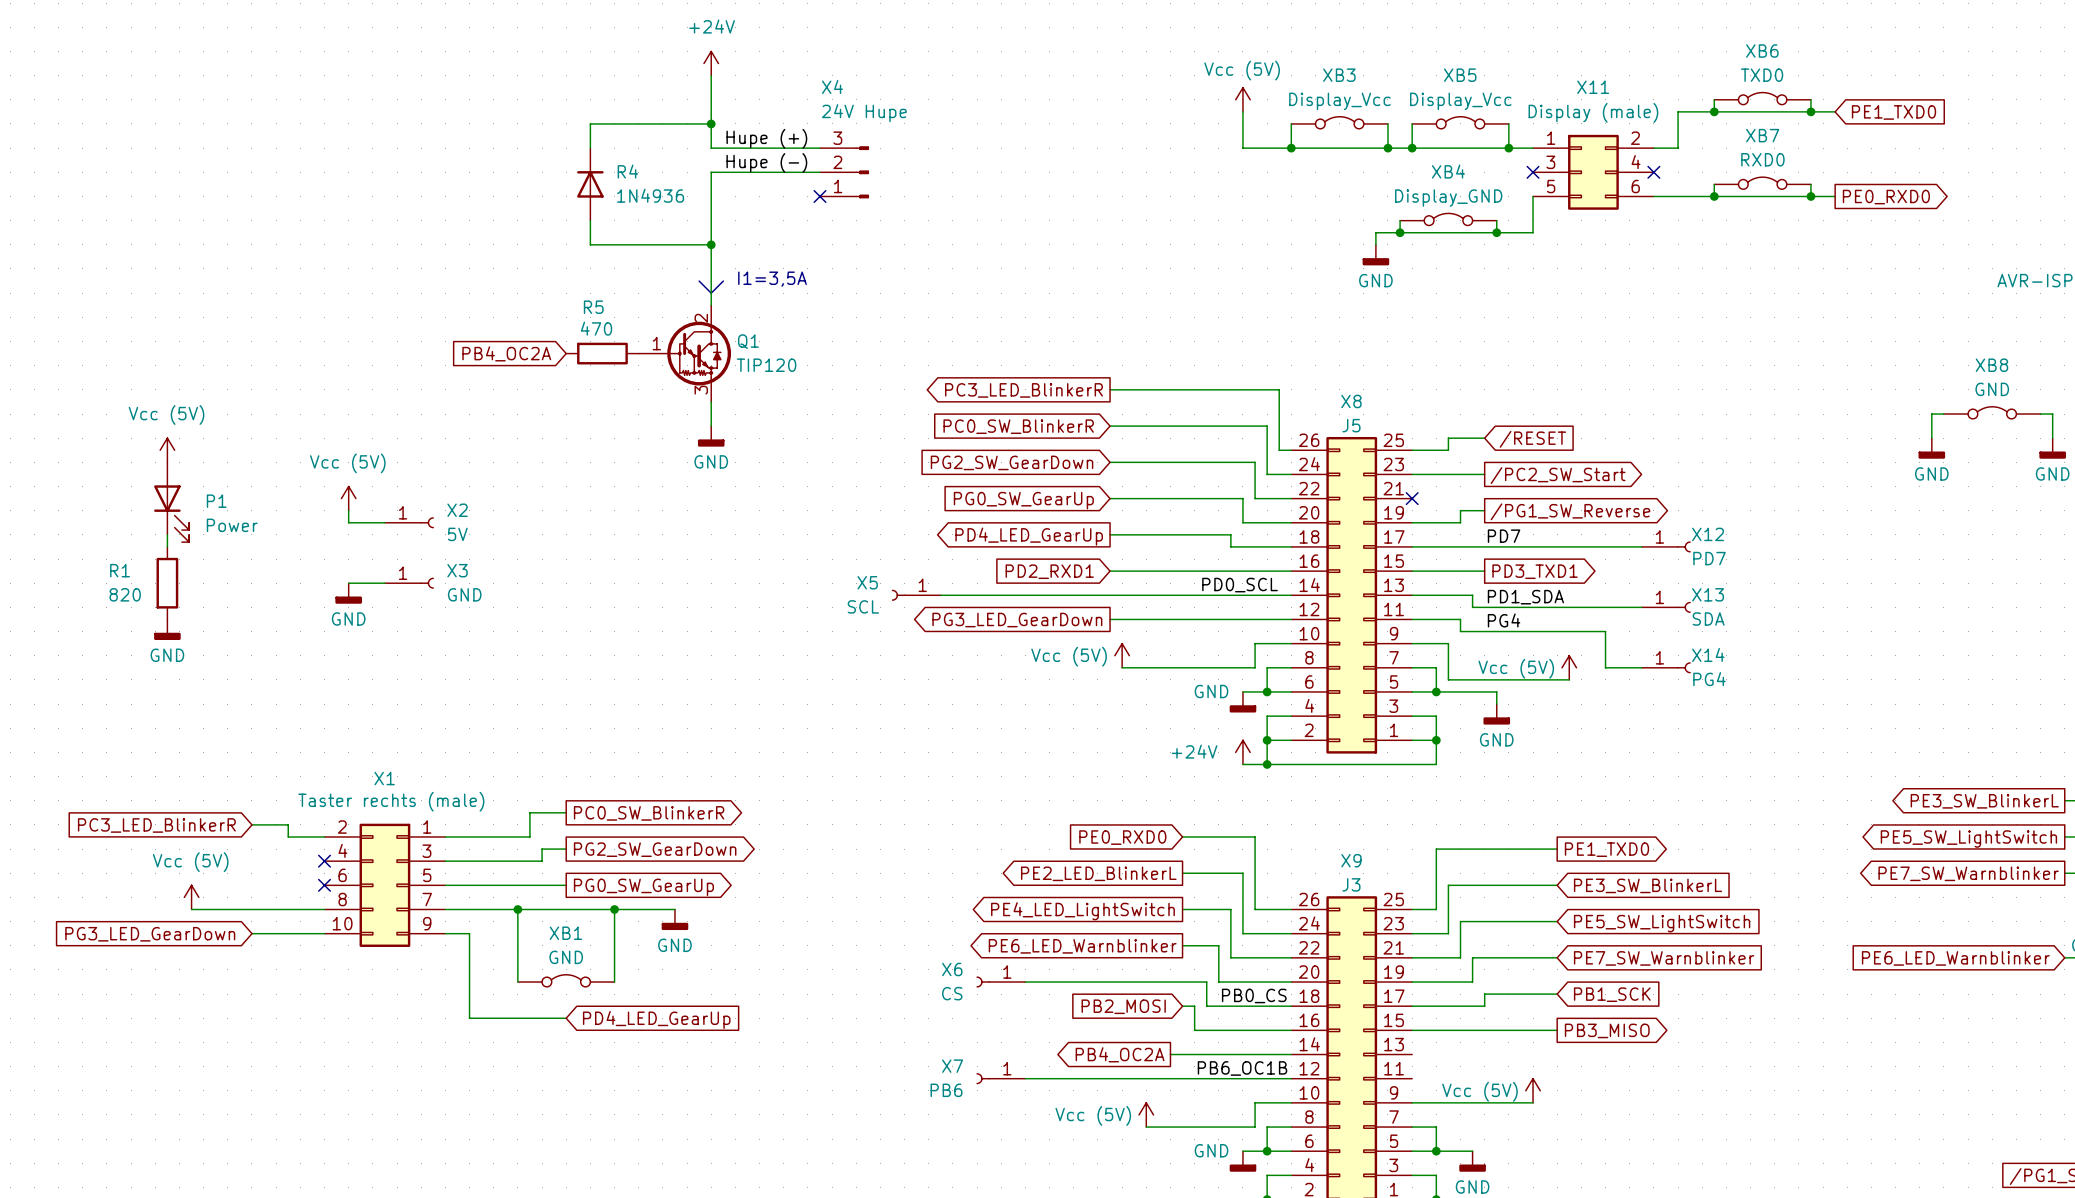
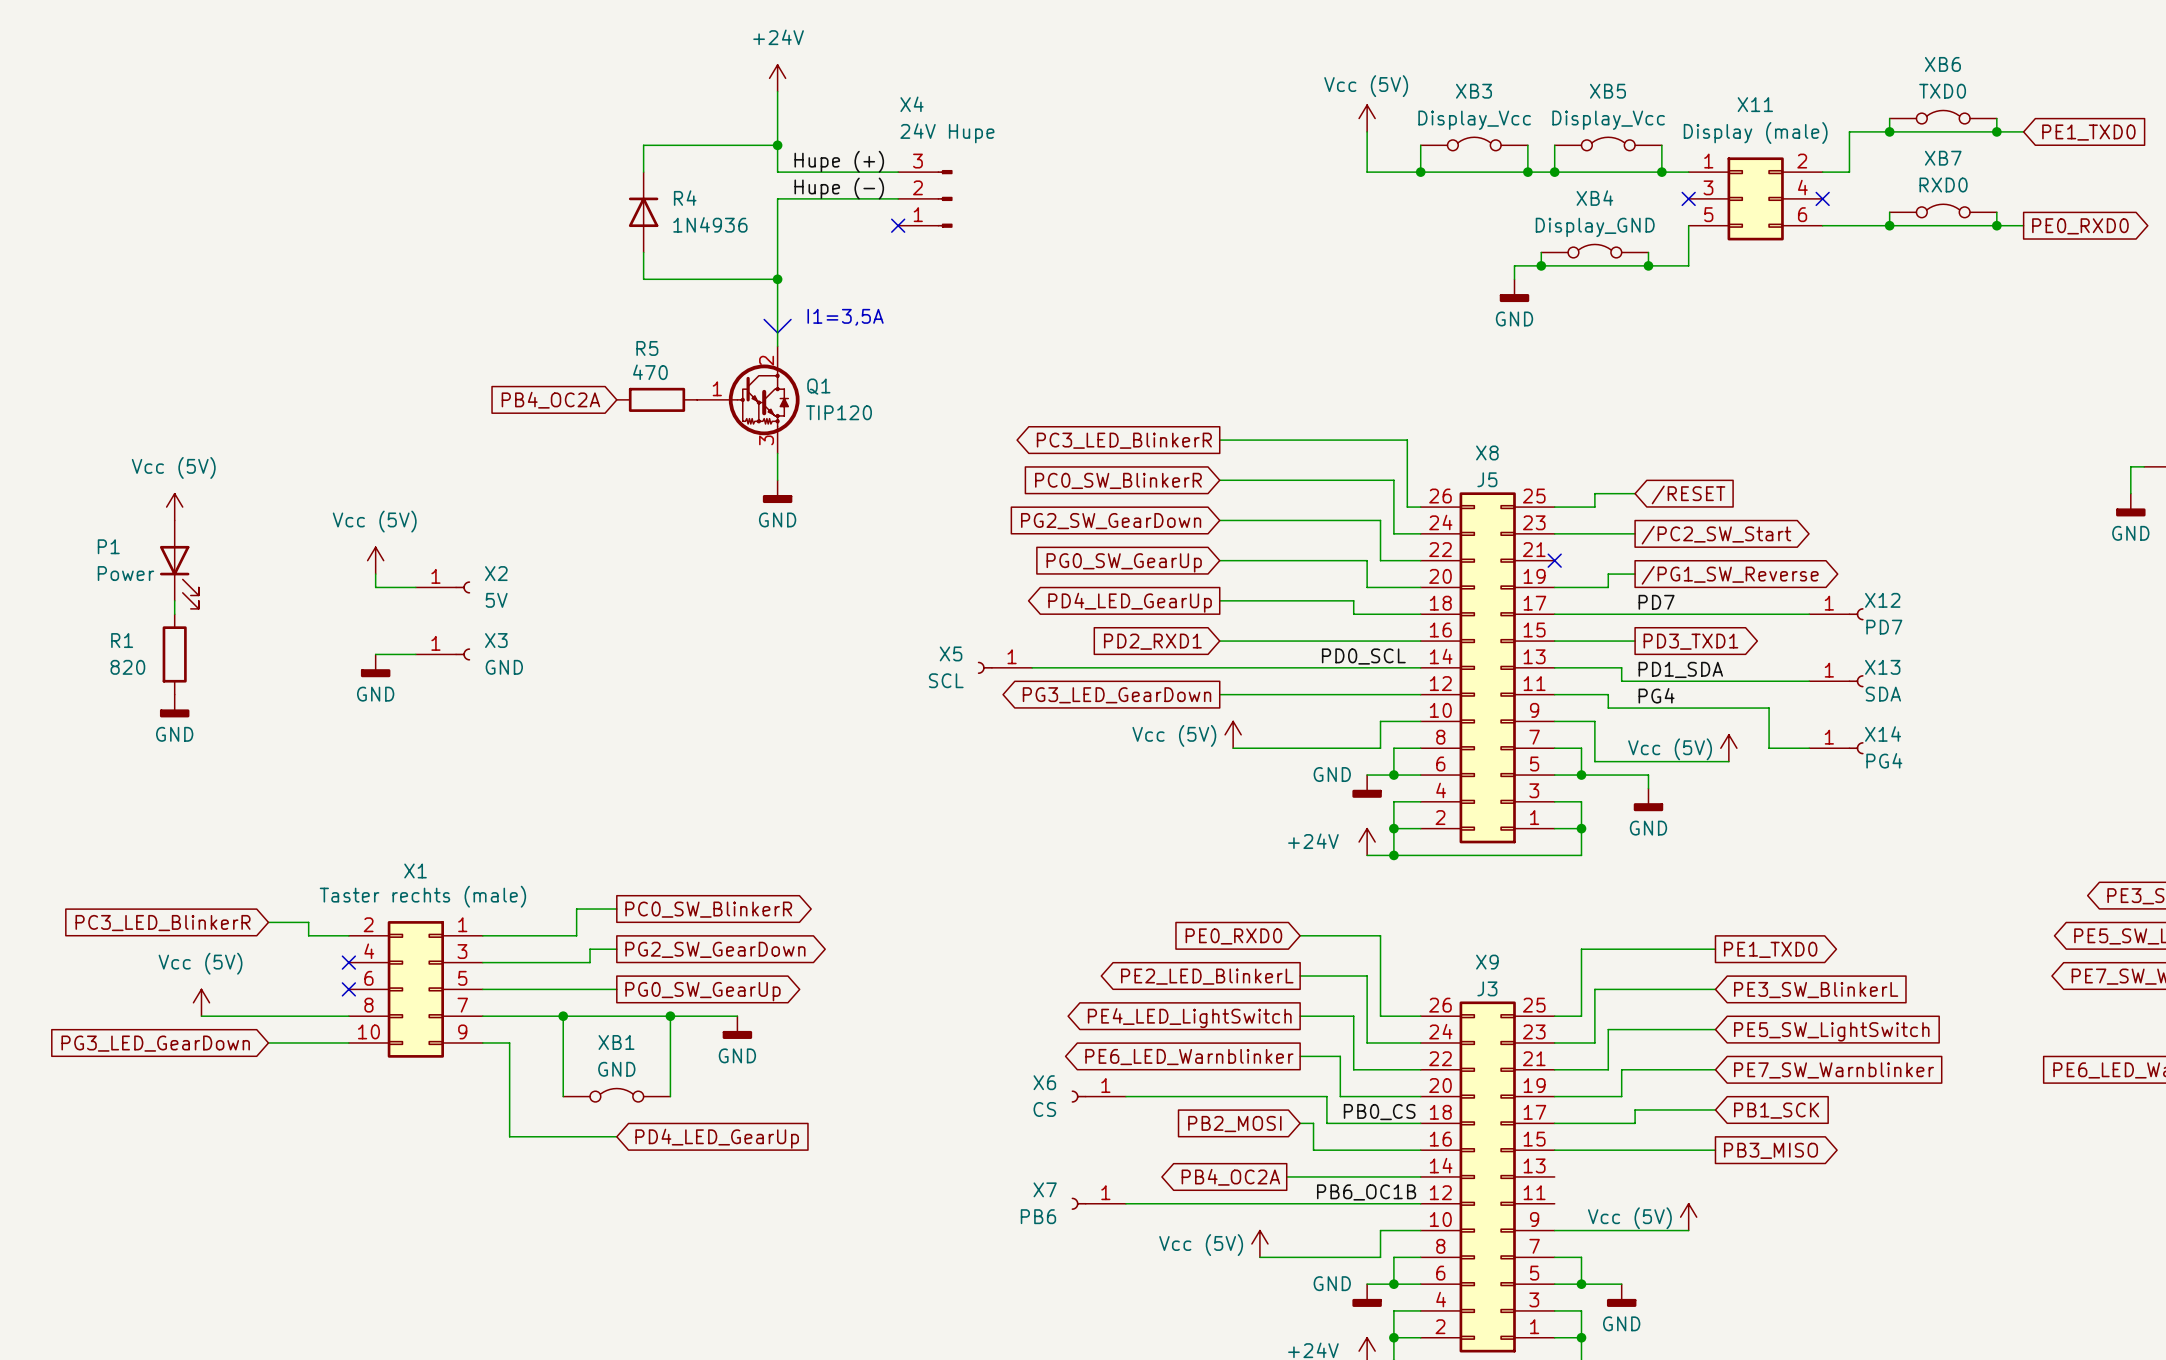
P1 name position: P1 (216, 501) -> P1 (108, 546)
P1 value position: Power (232, 525) -> Power (125, 573)

